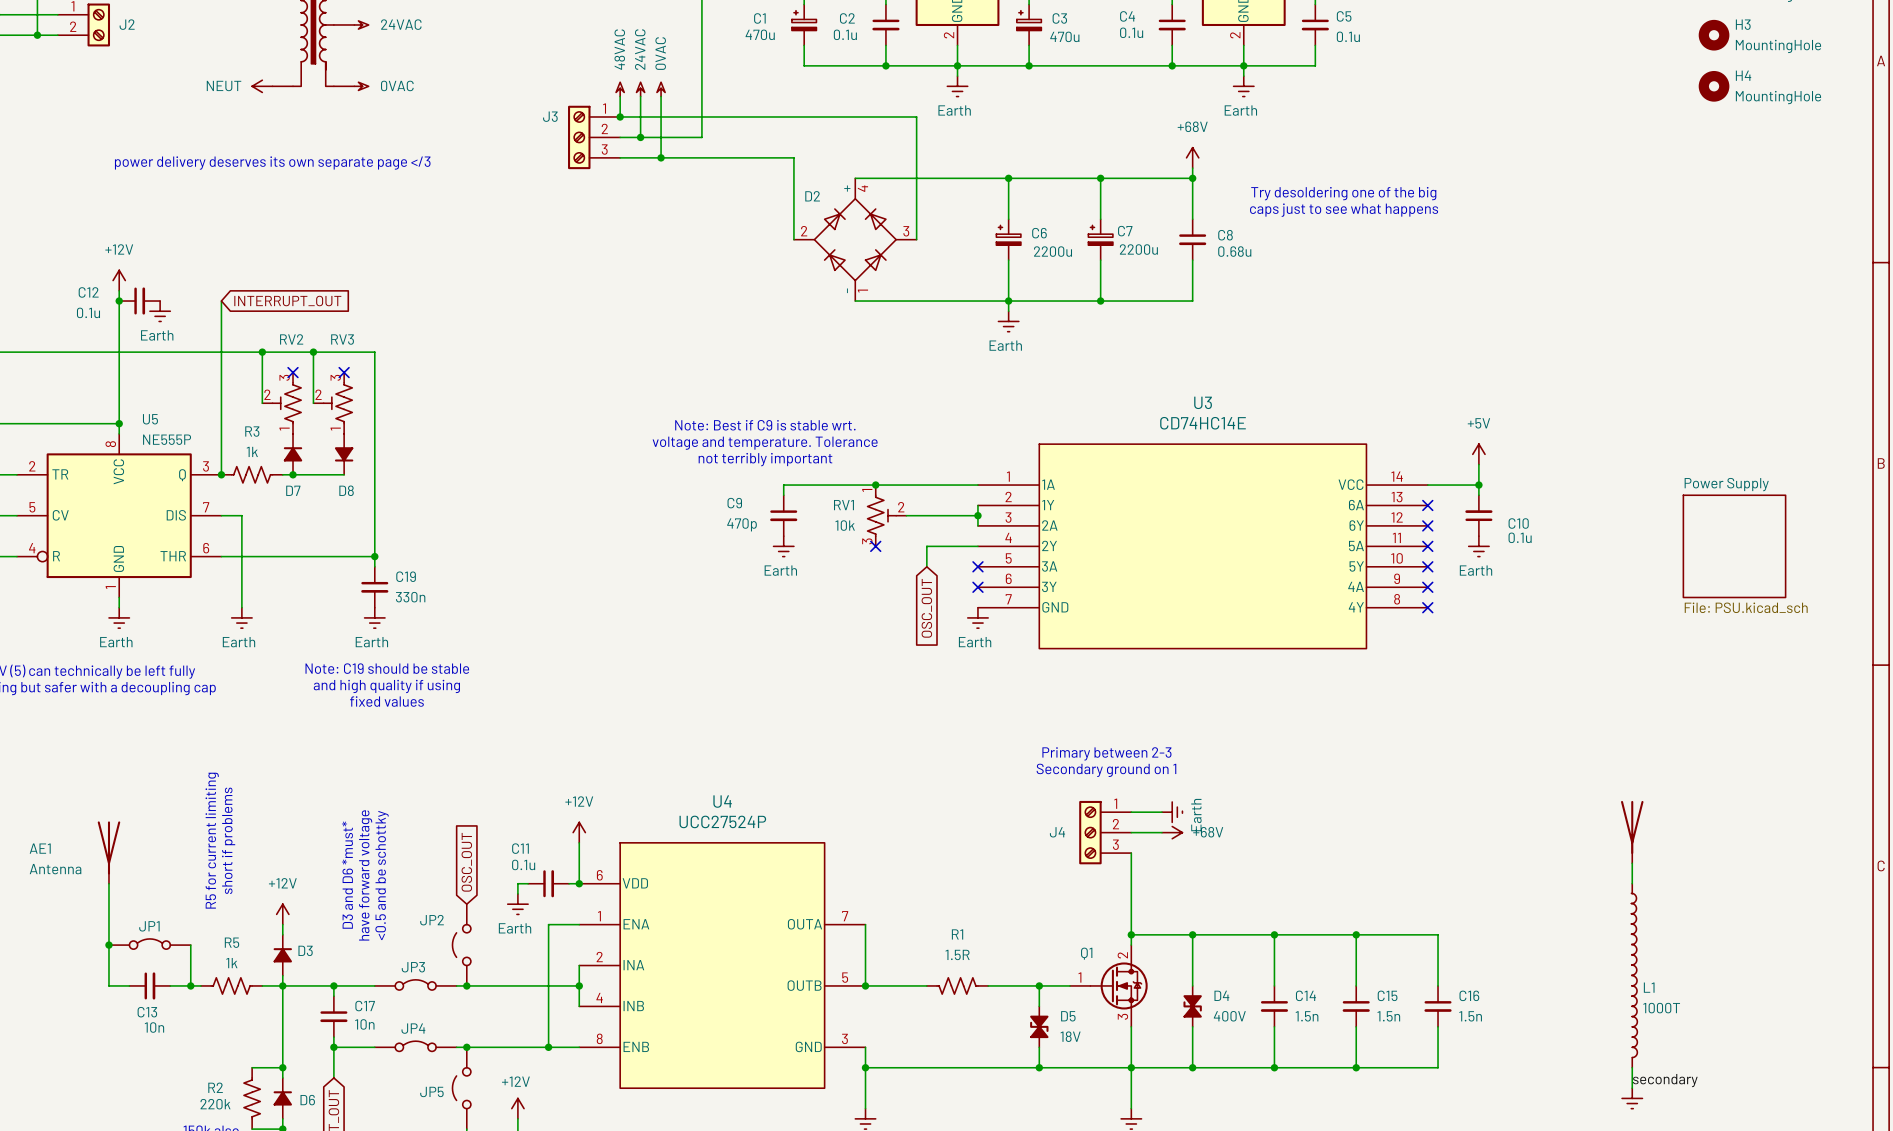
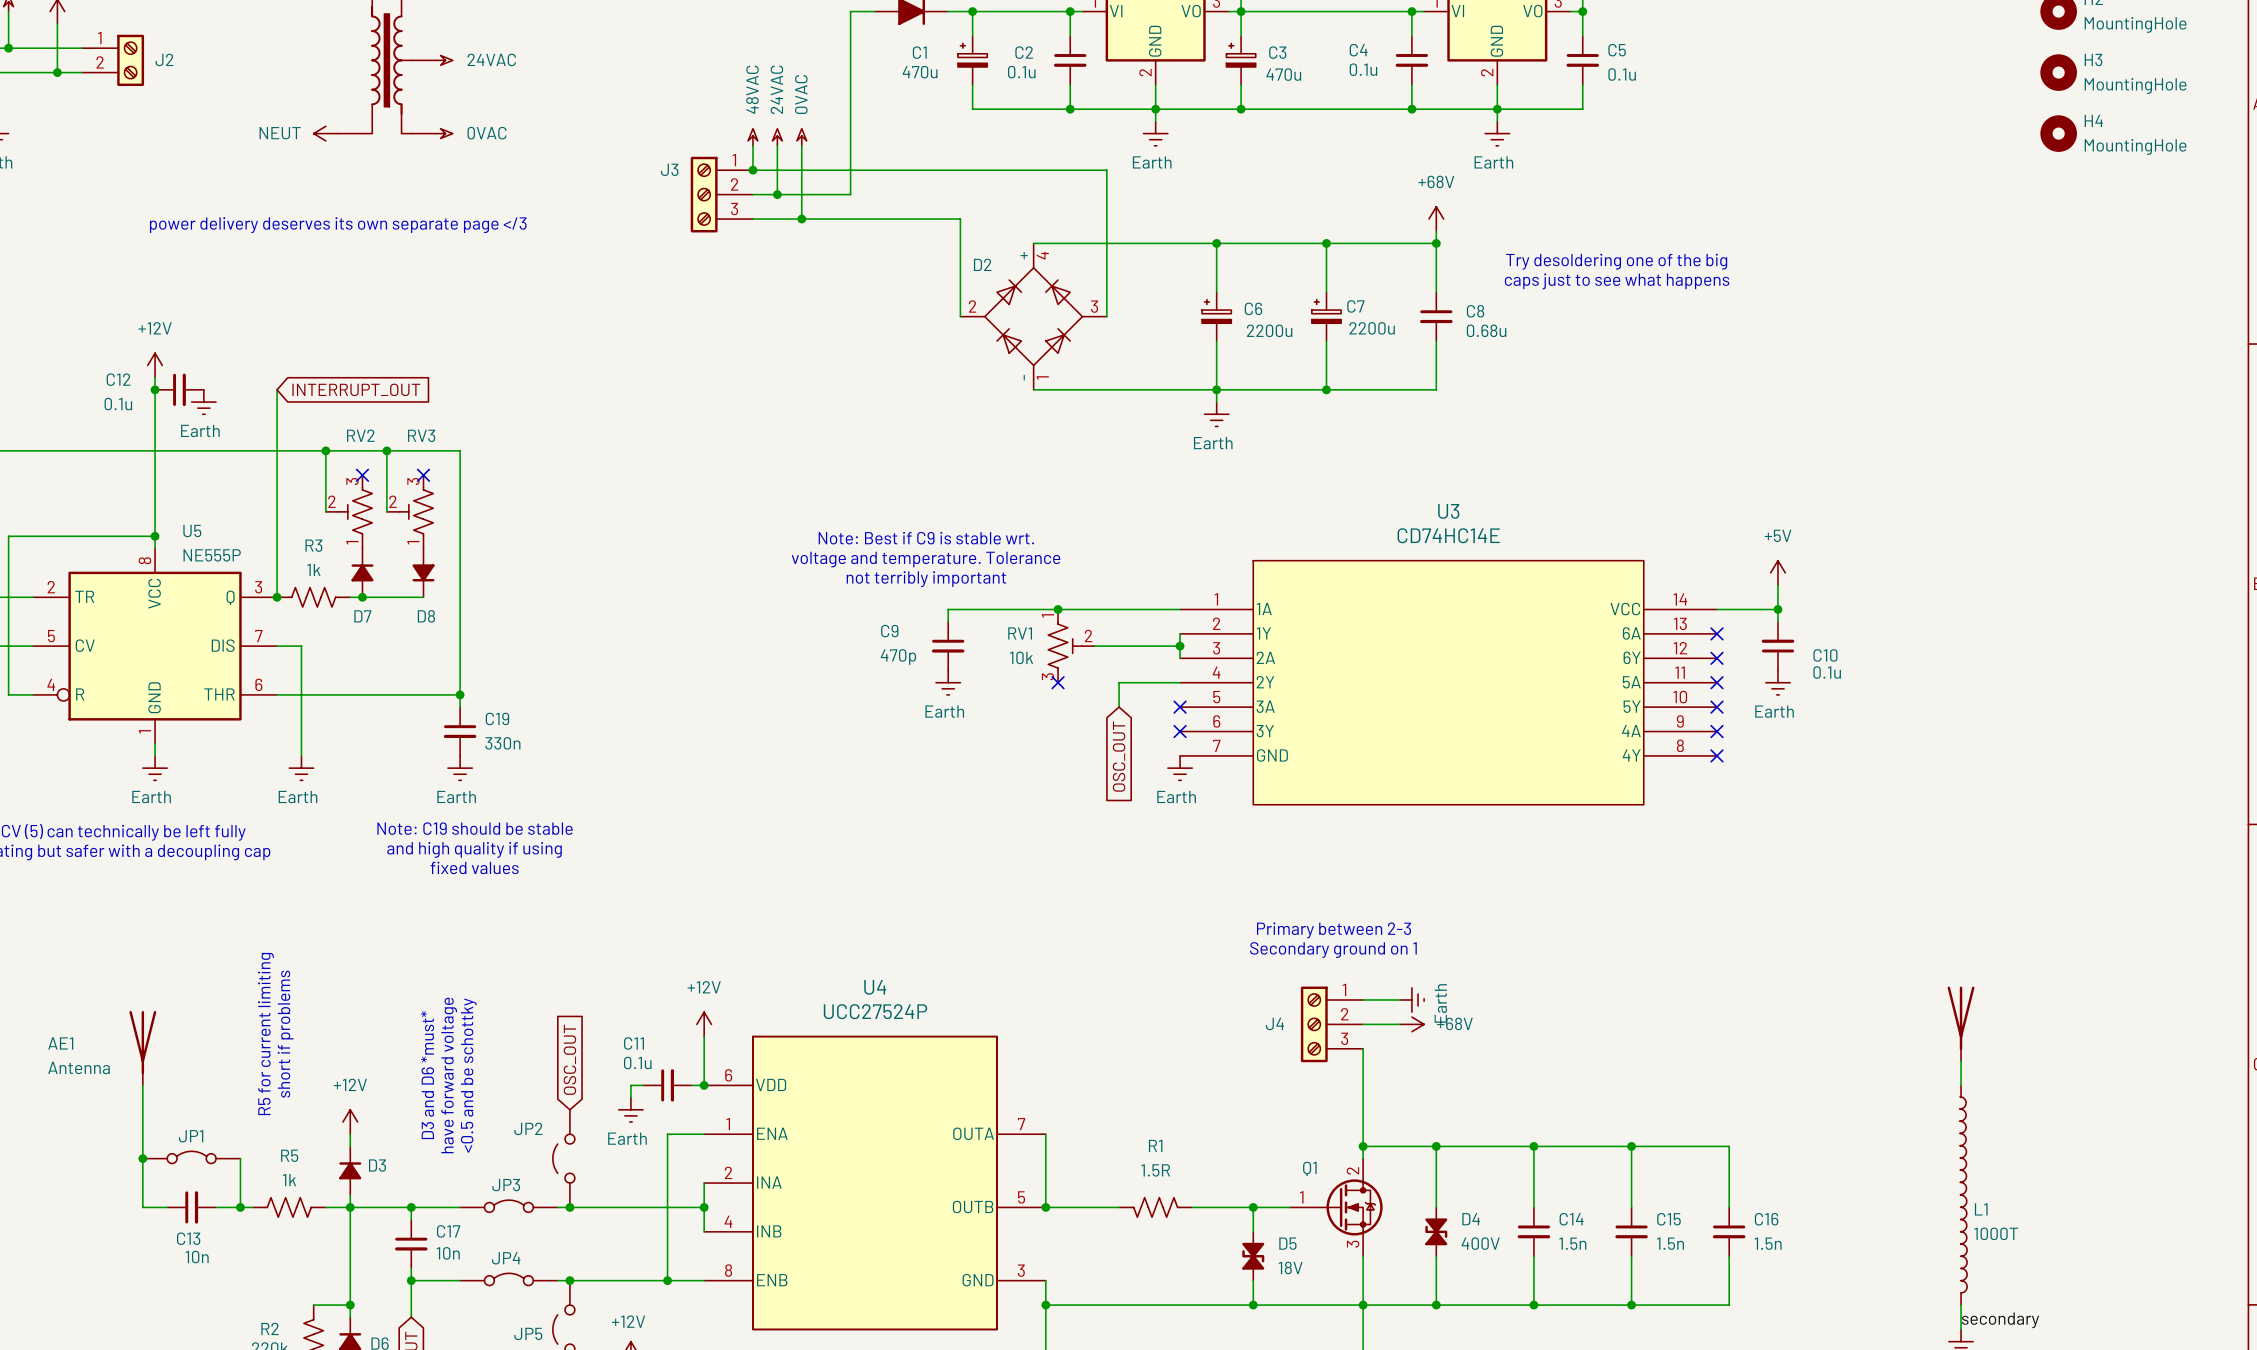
sheet Power Supply: File: PSU.kicad_sch (1734, 546) -> none

